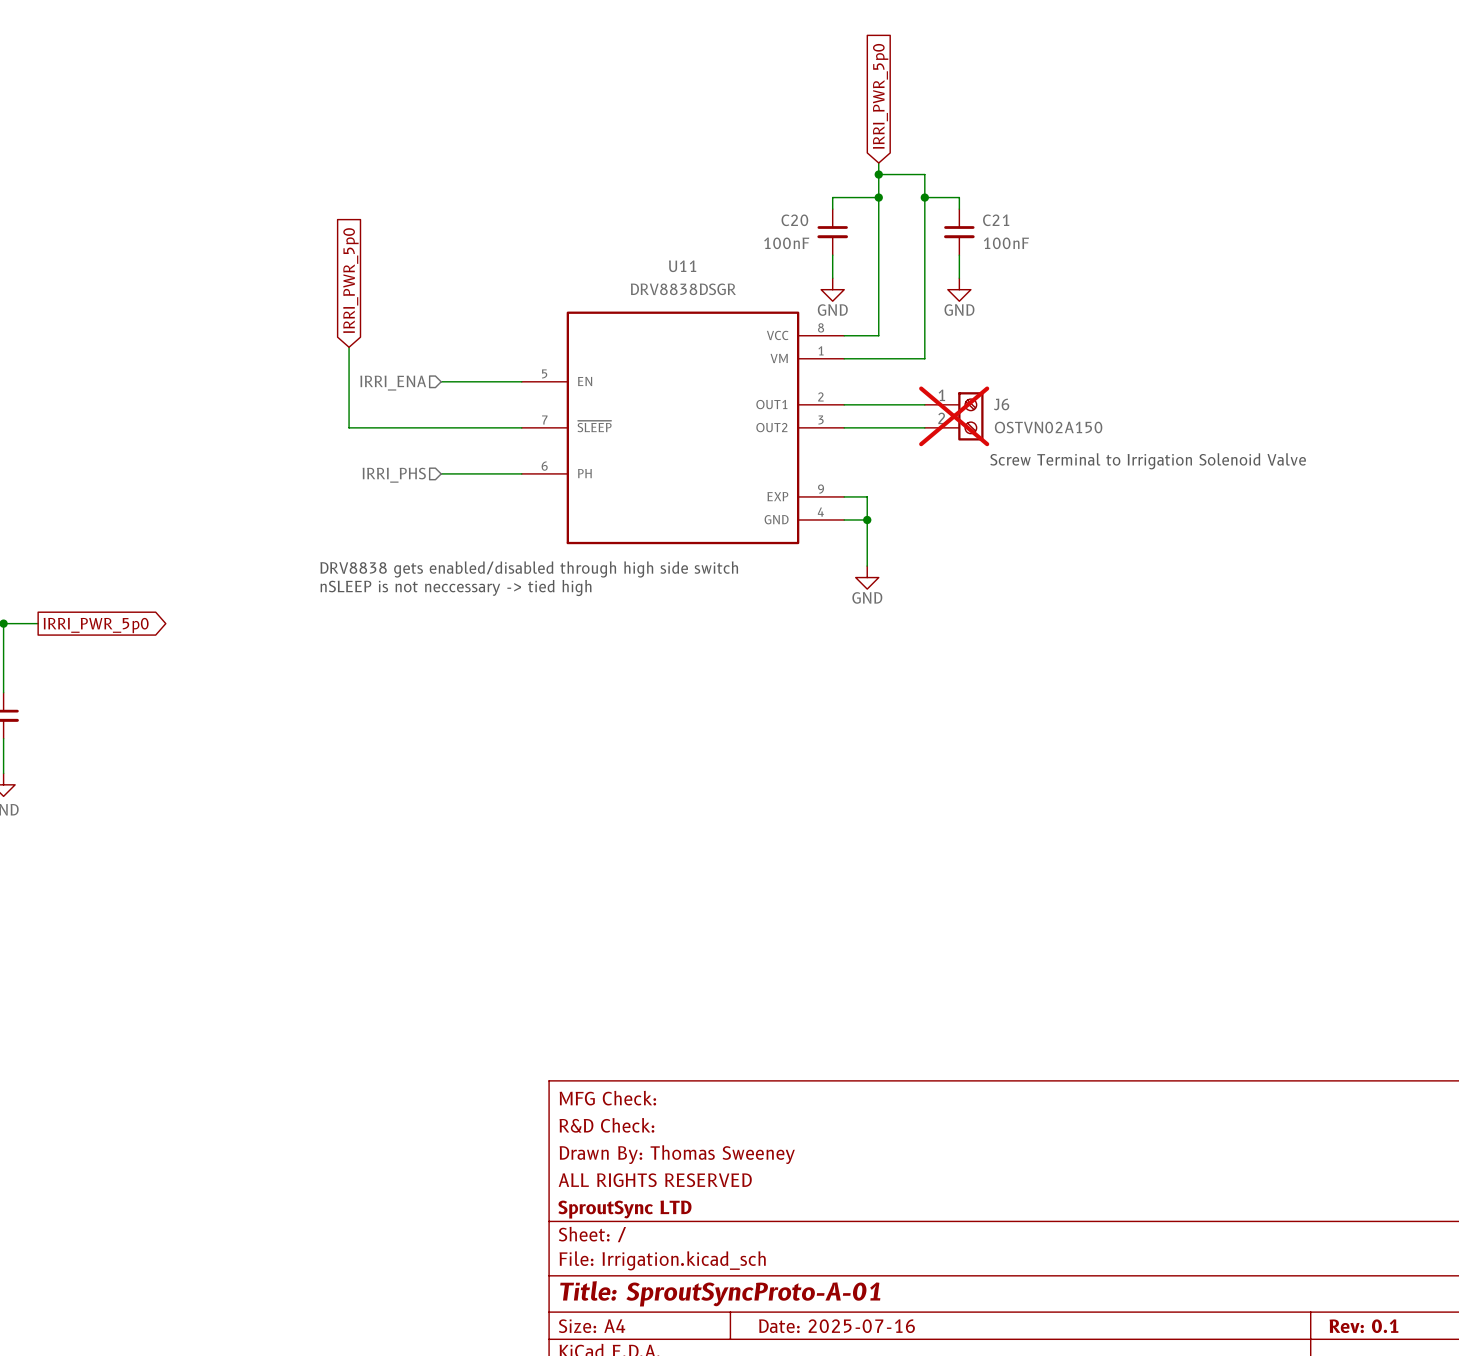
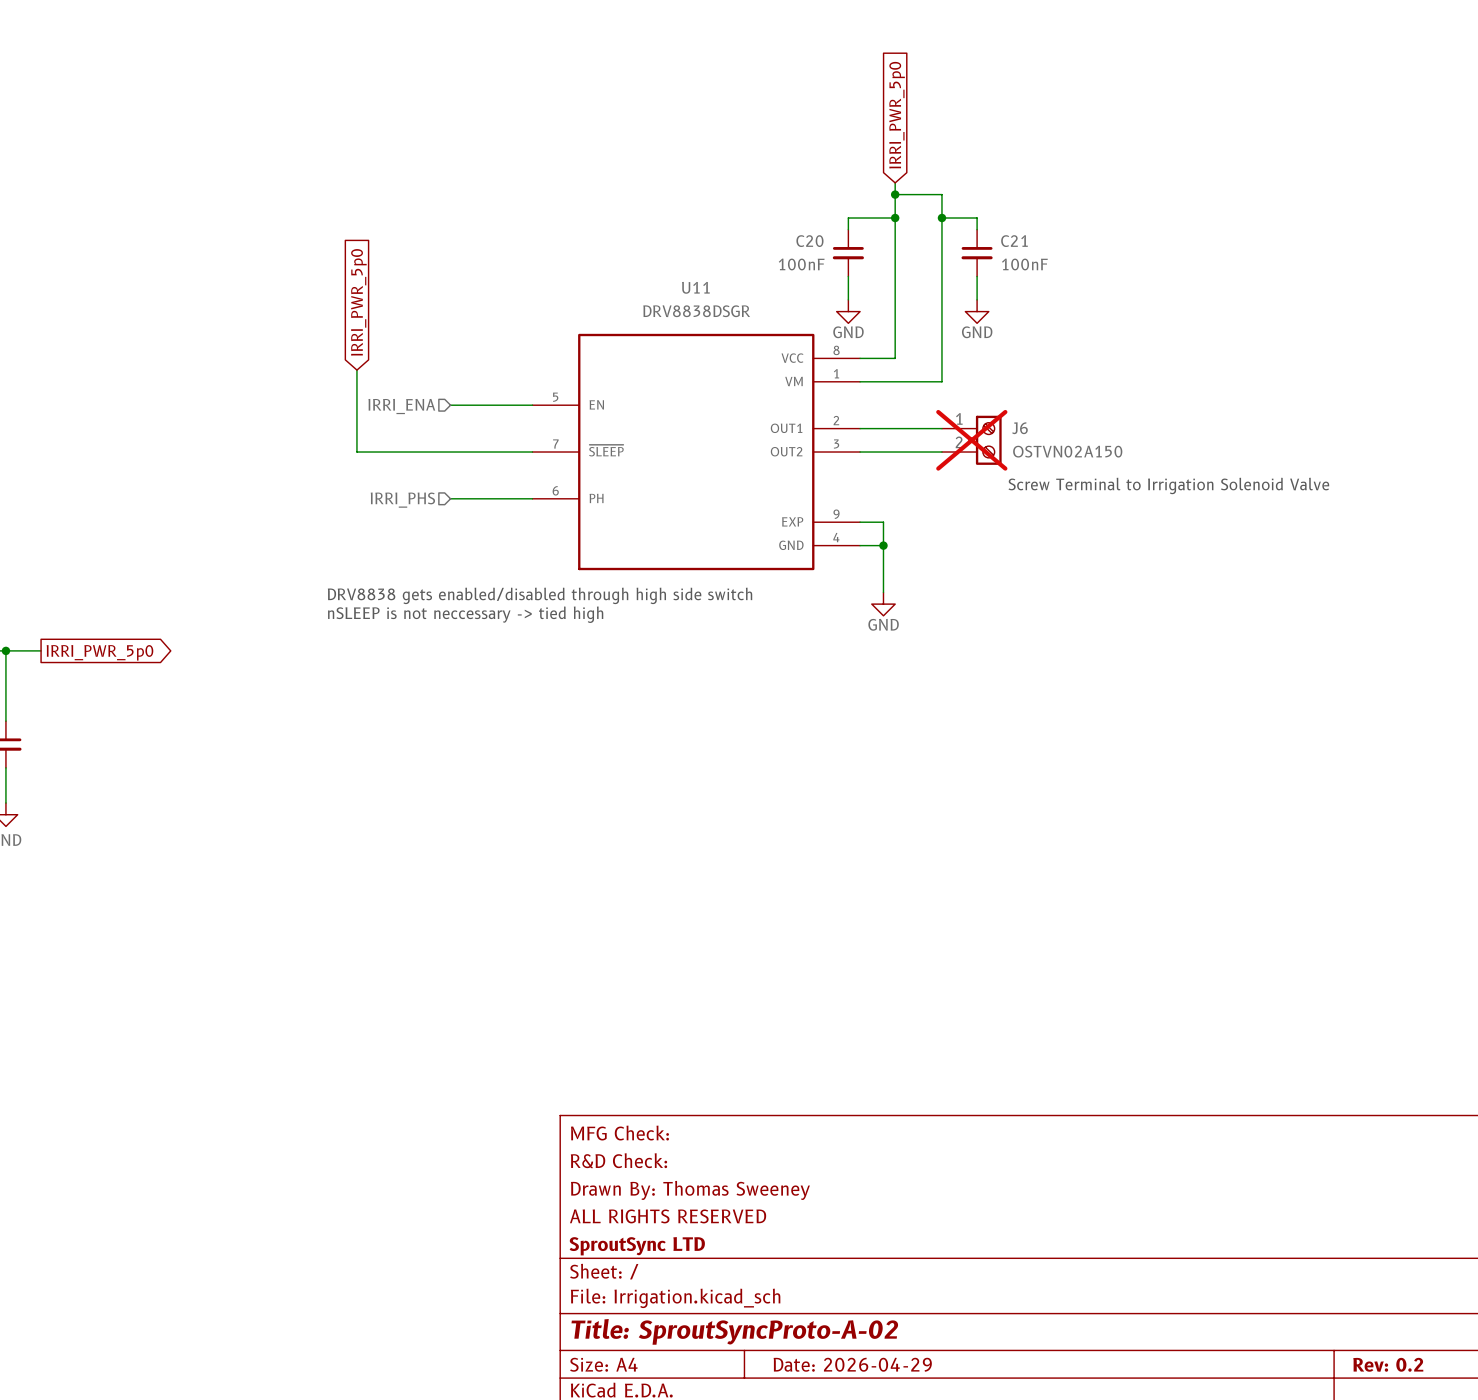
title block: Title: SproutSyncProto-A-01 (720, 1293) -> Title: SproutSyncProto-A-02 (734, 1331)
title block: Date: 2025-07-16 (837, 1326) -> Date: 2026-04-29 (852, 1364)
title block: Rev: 0.1 (1363, 1326) -> Rev: 0.2 (1388, 1364)

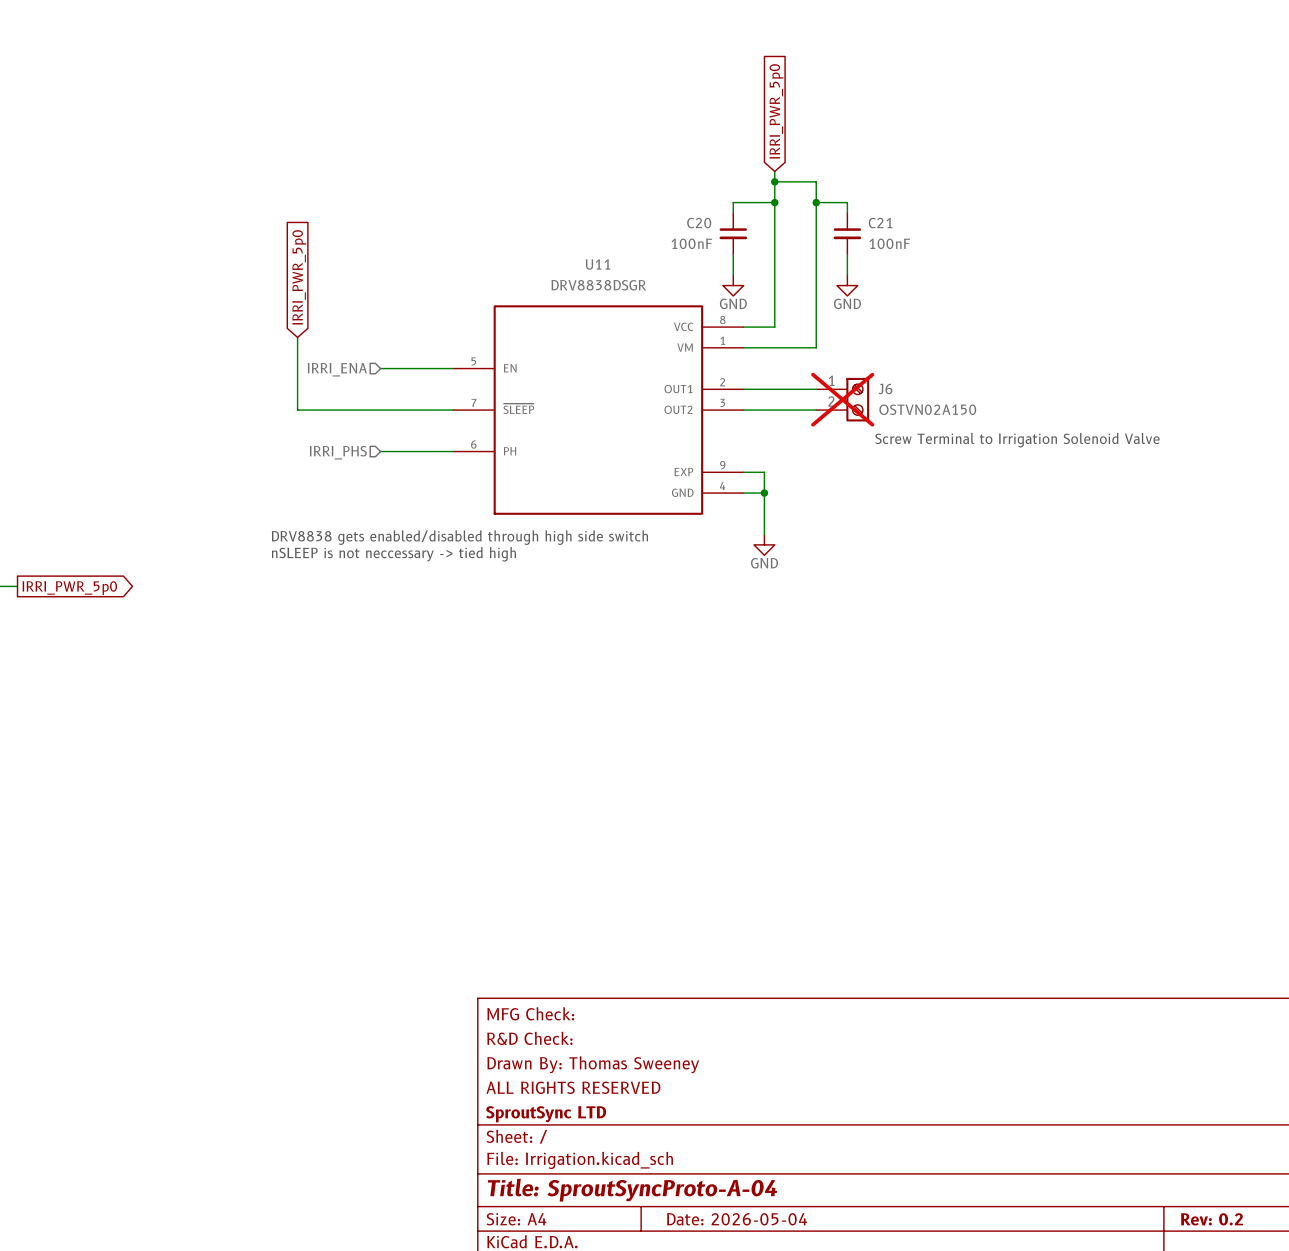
title block: Title: SproutSyncProto-A-02 (734, 1331) -> Title: SproutSyncProto-A-04 (632, 1190)
title block: Date: 2026-04-29 (852, 1364) -> Date: 2026-05-04 (737, 1219)

